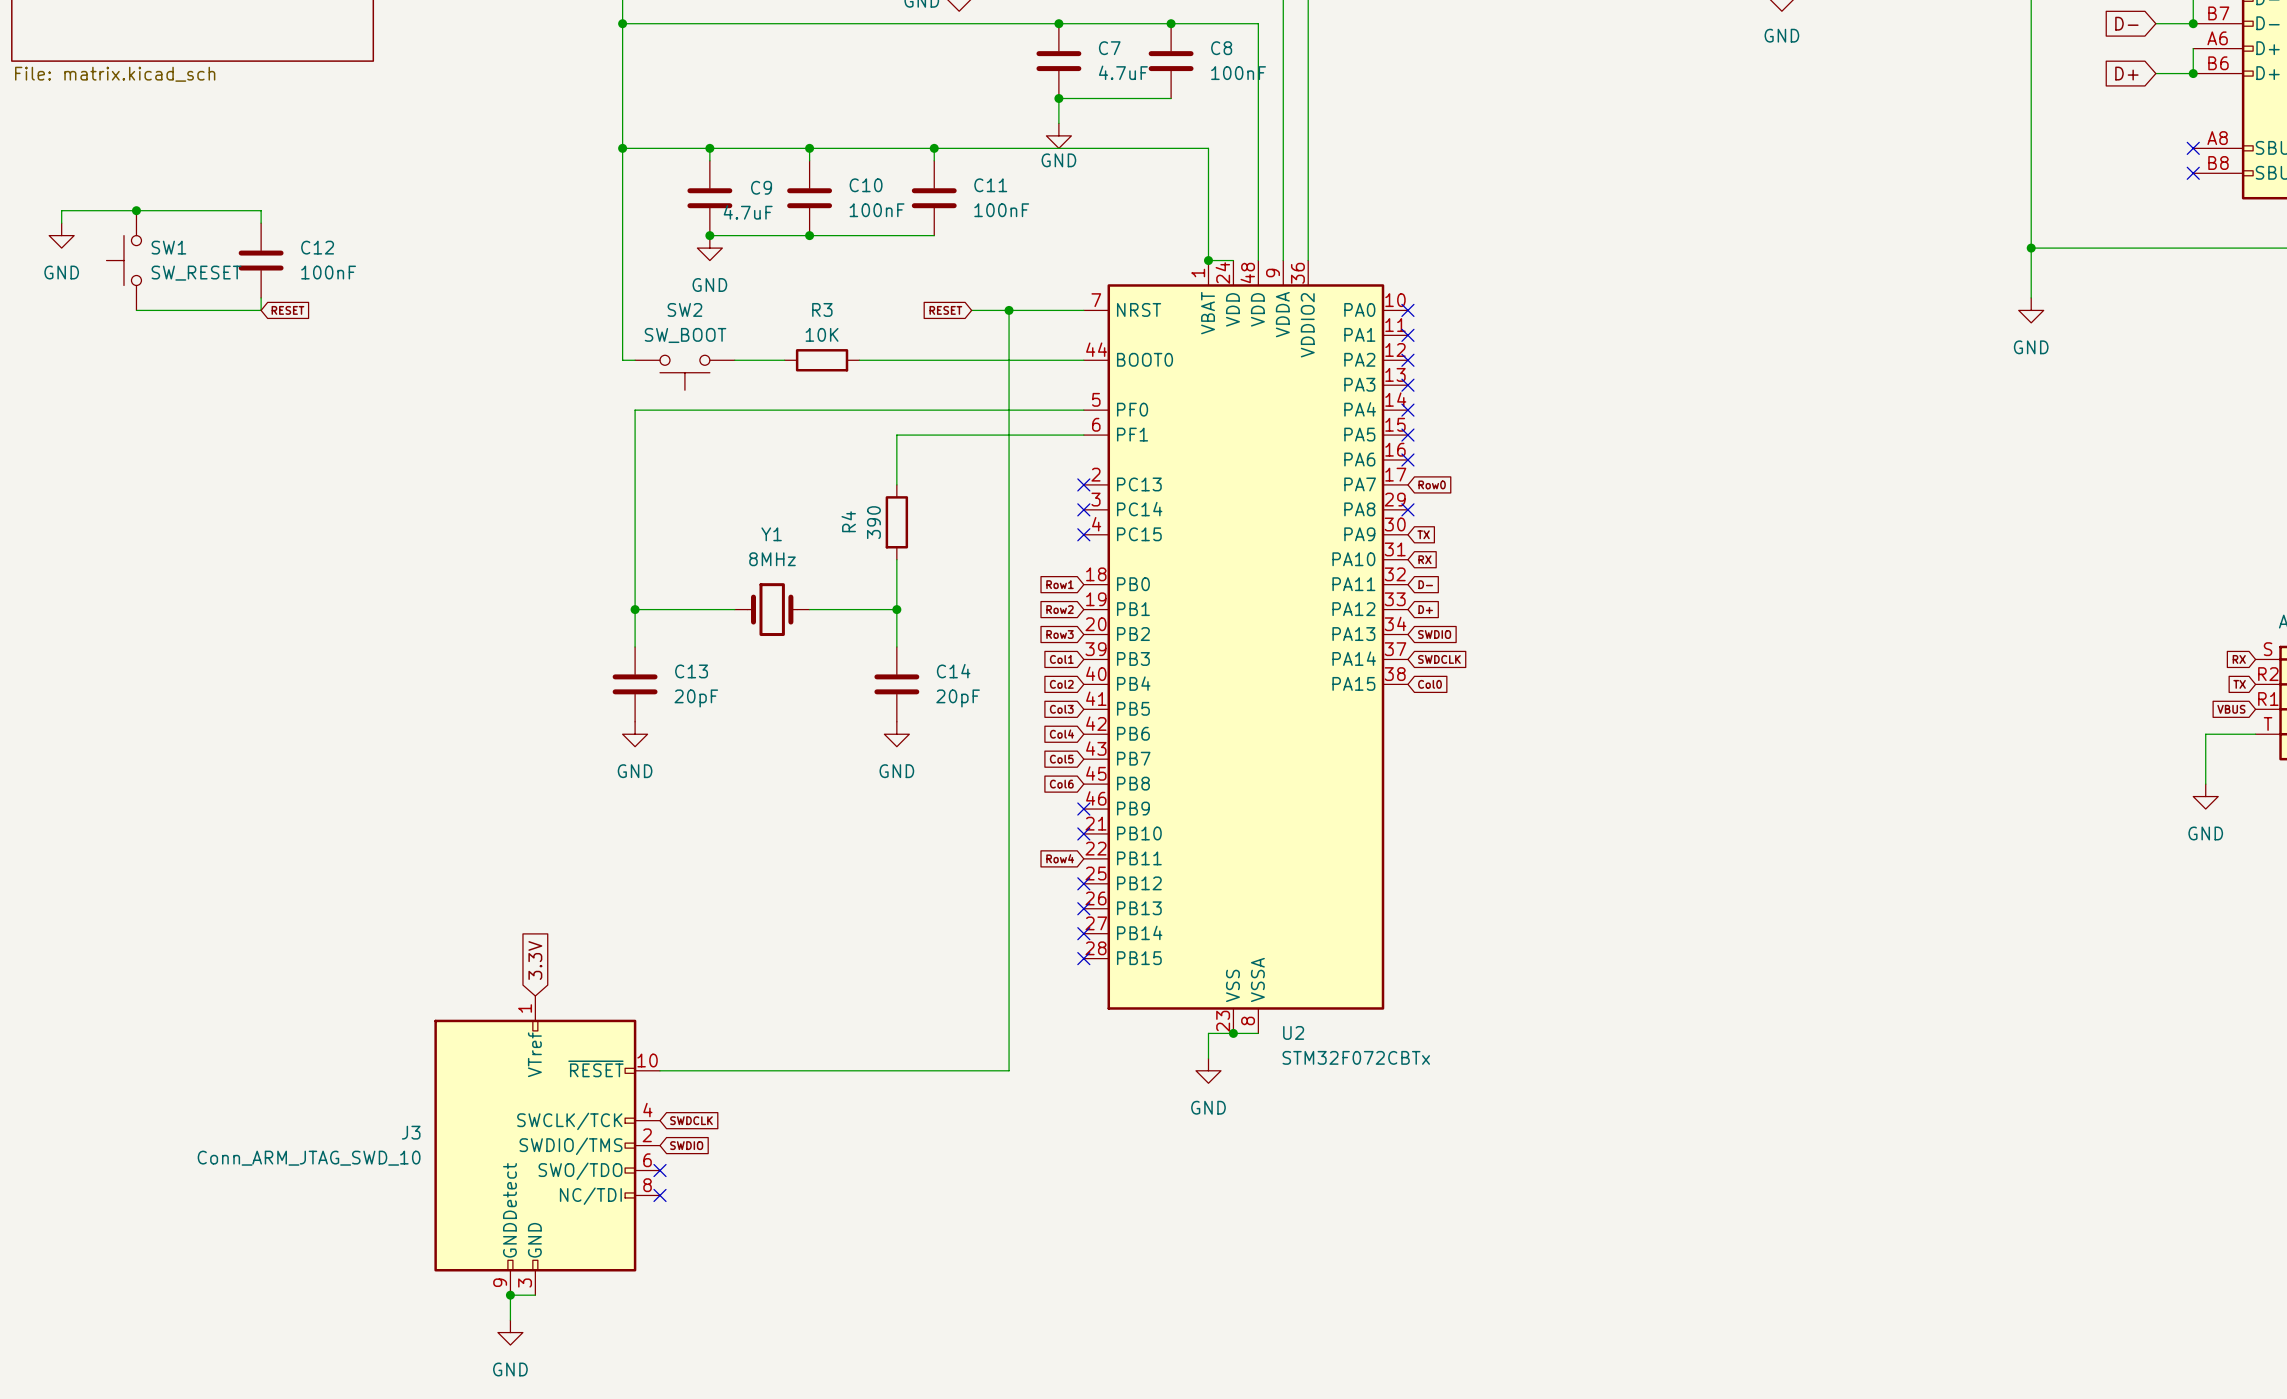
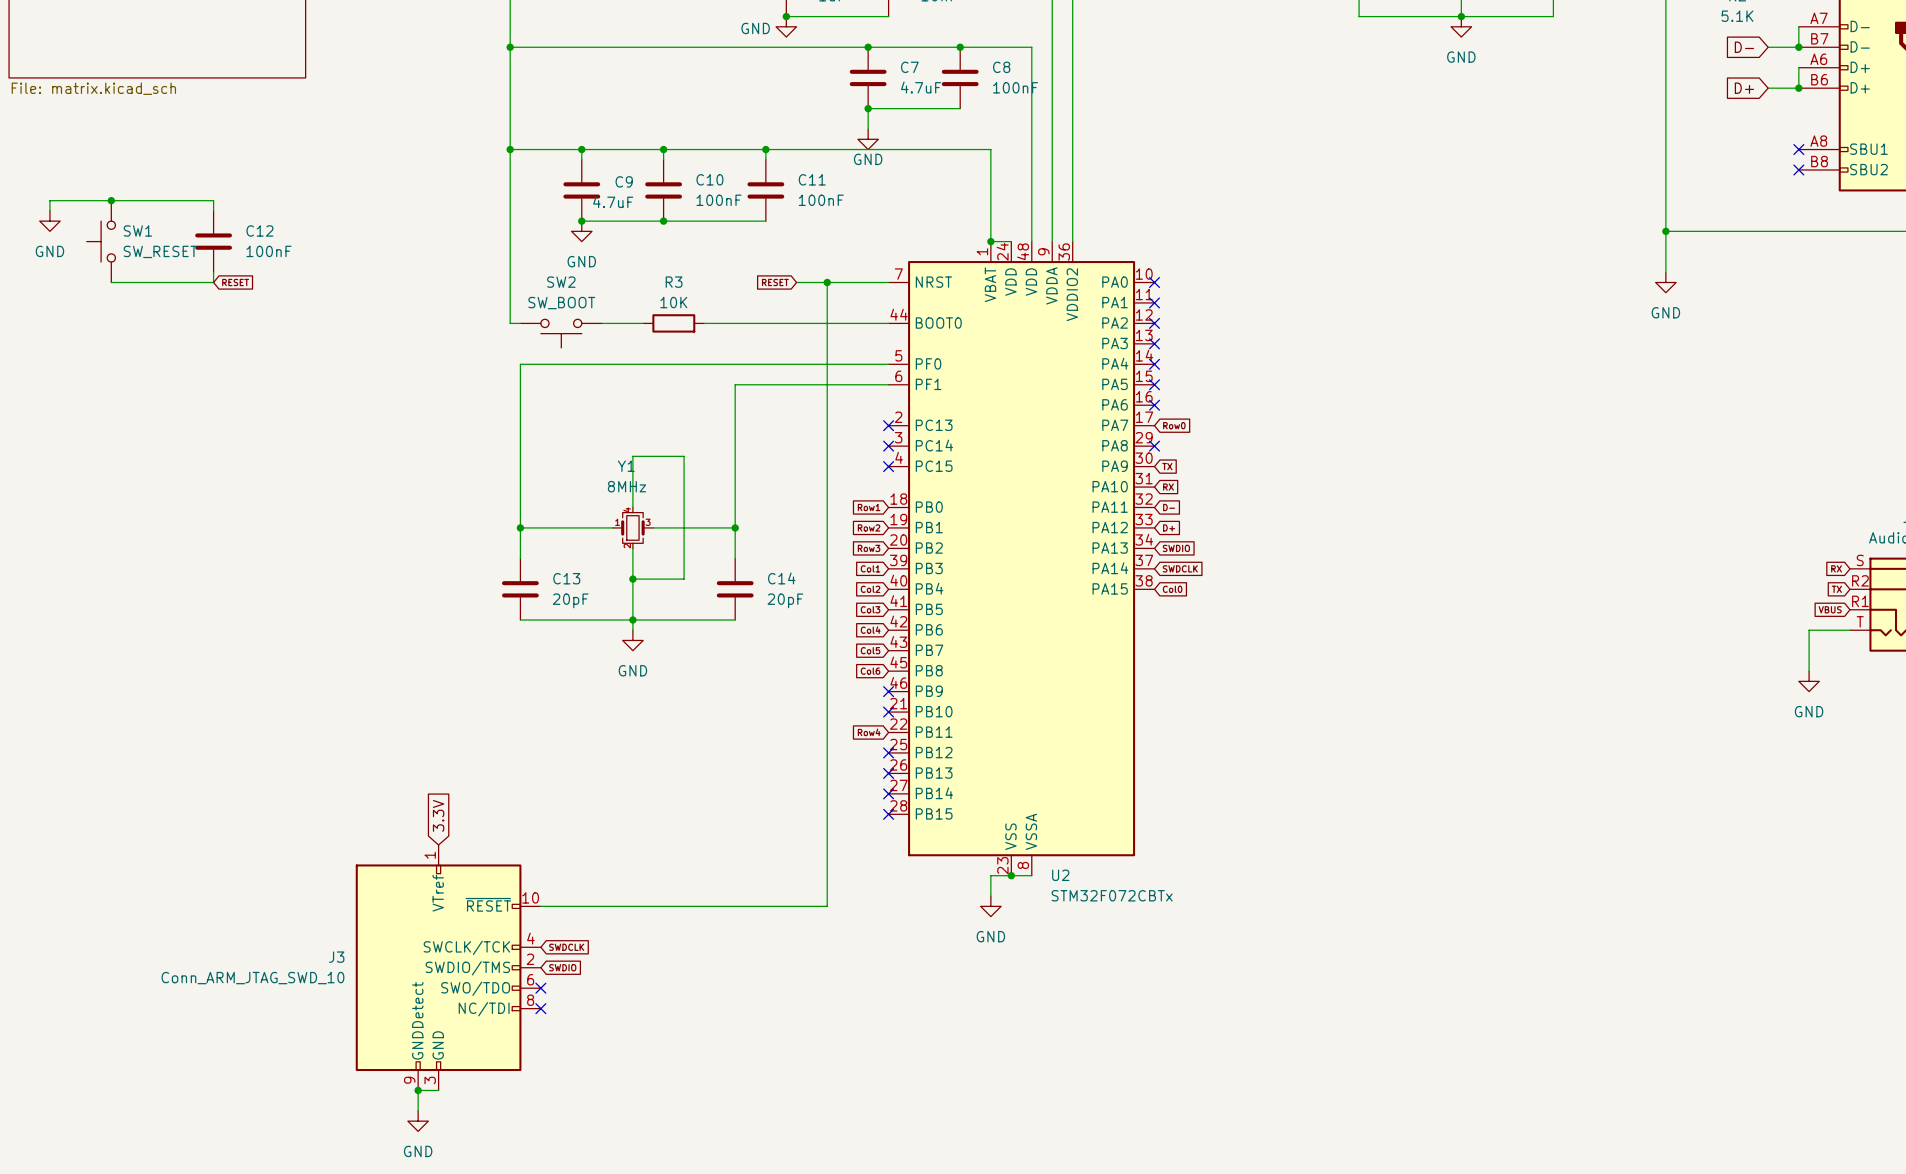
wire: none -> (735, 425) (735, 487)
R4: 390 (896, 522) -> none
Y1 symbol: [734, 583, 810, 637] -> [612, 507, 654, 549]
wire: none -> (632, 507) (632, 456) (684, 456) (684, 579) (632, 579)
wire: none -> (632, 548) (632, 630)
junction: none -> (632, 579)
wire: none -> (520, 620) (735, 620)
junction: none -> (632, 620)
power symbol: GND (635, 734) -> none
power symbol: GND (896, 734) -> none
power symbol: none -> GND (632, 640)

